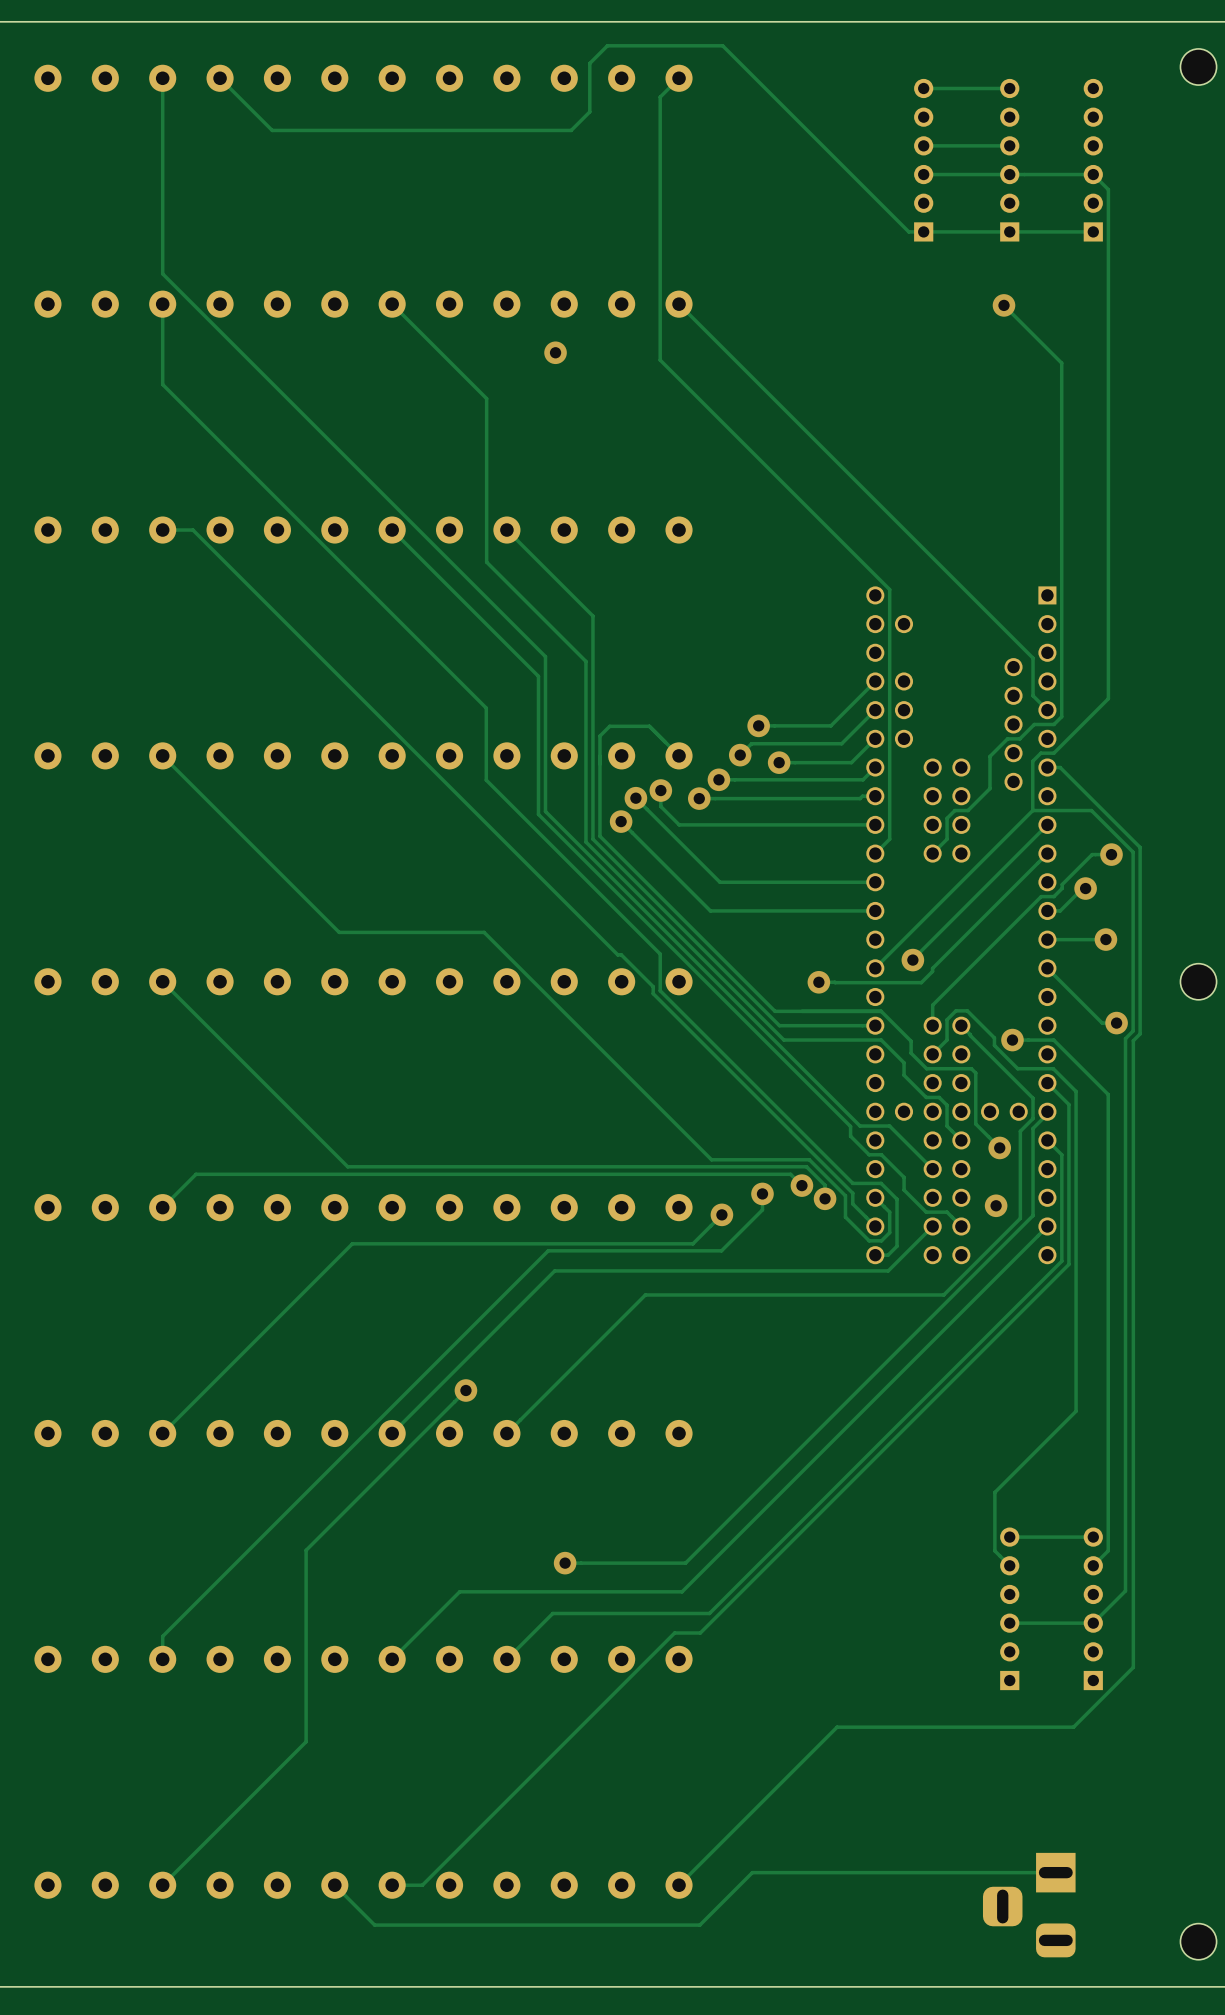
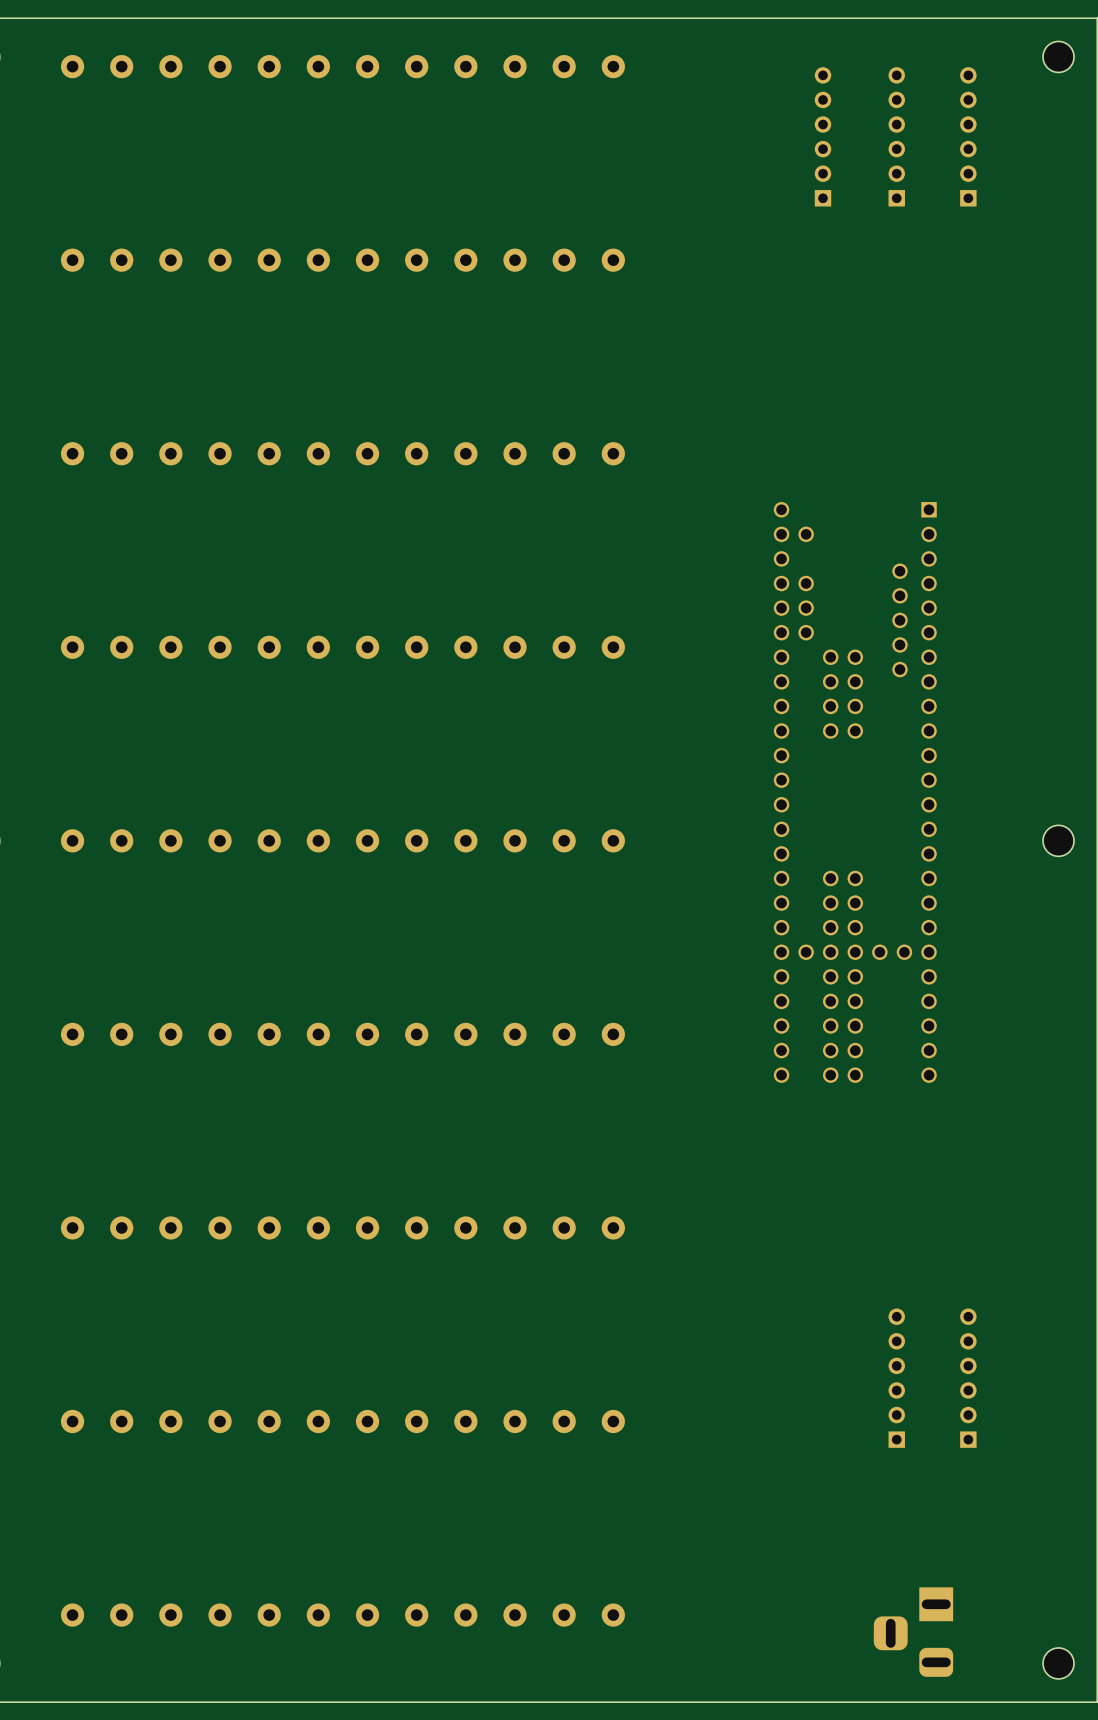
track: (162, 78) (162, 273) (545, 656) (545, 811) (860, 1126) (889, 1126) (932, 1169) -> none
track: (220, 78) (272, 130) (571, 130) (589, 111) (589, 63) (607, 45) (722, 45) (908, 231) (1093, 231) -> none
track: (679, 78) (660, 97) (660, 360) (889, 589) (889, 839) (875, 853) -> none
track: (1009, 88) (923, 88) -> none
track: (1009, 145) (923, 145) -> none
track: (923, 174) (1093, 174) (1108, 189) (1108, 698) (1053, 753) (1040, 753) (1032, 761) (1032, 810) -> none
track: (162, 304) (162, 384) (486, 708) (486, 780) (660, 954) (660, 990) (852, 1183) (881, 1183) (897, 1199) (897, 1246) (888, 1255) (875, 1255) -> none
track: (392, 304) (486, 398) (486, 562) (585, 661) (585, 842) (783, 1040) (881, 1040) (904, 1062) (904, 1075) (926, 1097) (939, 1097) (947, 1105) (947, 1126) (961, 1140) -> none
track: (679, 304) (1033, 658) (1033, 695) (1047, 710) -> none
track: (1004, 305) (1061, 363) (1061, 716) (1053, 724) (1034, 724) (1019, 738) (1007, 738) (989, 756) (989, 788) (968, 810) (954, 810) (947, 818) (947, 839) (932, 853) -> none
via: (1004, 305) -> none
via: (555, 352) -> none
track: (162, 530) (192, 530) (617, 954) (621, 954) (653, 986) (653, 993) (852, 1193) (852, 1203) (875, 1226) -> none
track: (392, 530) (538, 676) (538, 814) (850, 1126) (850, 1136) (869, 1154) (881, 1154) (904, 1177) (904, 1190) (926, 1212) (947, 1212) (961, 1226) -> none
track: (506, 530) (592, 616) (592, 839) (779, 1025) (875, 1025) -> none
track: (875, 681) (830, 725) (758, 725) -> none
track: (875, 710) (841, 743) (751, 743) (740, 755) -> none
via: (758, 725) -> none
track: (875, 738) (851, 762) (779, 762) -> none
track: (162, 755) (339, 932) (484, 932) (711, 1159) (809, 1159) (845, 1195) (845, 1217) (869, 1240) (881, 1240) (889, 1232) (889, 1212) (875, 1197) -> none
track: (679, 755) (649, 726) (609, 726) (599, 736) (599, 836) (775, 1011) (881, 1011) (911, 1041) (911, 1053) (926, 1068) (971, 1068) (975, 1073) (975, 1123) (999, 1147) -> none
via: (740, 755) -> none
via: (779, 762) -> none
track: (875, 767) (863, 779) (718, 779) -> none
track: (1047, 767) (1060, 767) (1140, 847) (1140, 1033) (1133, 1040) (1133, 1667) (1073, 1727) (837, 1727) (679, 1885) -> none
via: (718, 779) -> none
track: (660, 790) (660, 806) (679, 824) (875, 824) -> none
via: (660, 790) -> none
track: (875, 796) (862, 796) (860, 798) (699, 798) -> none
track: (635, 798) (719, 882) (875, 882) -> none
via: (635, 798) -> none
via: (699, 798) -> none
track: (1032, 810) (875, 968) -> none
track: (1032, 810) (1091, 810) (1133, 852) (1133, 1031) (1125, 1038) (1125, 1590) (1093, 1623) (1009, 1623) -> none
track: (621, 821) (710, 910) (875, 910) -> none
via: (621, 821) -> none
track: (1047, 824) (912, 960) -> none
track: (1047, 853) (932, 968) (932, 971) (921, 982) (818, 982) -> none
track: (1111, 854) (1092, 854) (1062, 884) (1062, 888) (1053, 896) (1041, 896) (932, 1005) (932, 1025) -> none
via: (1111, 854) -> none
track: (1085, 888) (1082, 888) (1060, 910) (1047, 910) -> none
via: (1085, 888) -> none
track: (1105, 939) (1047, 939) -> none
via: (1105, 939) -> none
via: (912, 960) -> none
track: (1047, 968) (1102, 1023) (1116, 1023) -> none
track: (162, 981) (347, 1166) (806, 1166) (825, 1185) (825, 1198) -> none
via: (818, 982) -> none
via: (1116, 1023) -> none
track: (961, 1025) (1033, 1098) (1033, 1118) (1020, 1131) (1020, 1218) (943, 1294) (645, 1294) (506, 1433) -> none
track: (1012, 1040) (1053, 1040) (1108, 1094) (1108, 1550) (1093, 1565) -> none
via: (1012, 1040) -> none
track: (932, 1054) (947, 1040) (947, 1019) (955, 1010) (967, 1010) (994, 1037) (994, 1045) (1017, 1068) (1053, 1068) (1076, 1091) (1076, 1411) (994, 1492) (994, 1550) (1009, 1565) -> none
track: (1047, 1083) (1068, 1104) (1068, 1264) (700, 1633) (674, 1633) (422, 1885) (392, 1885) -> none
track: (1047, 1111) (1047, 1114) (1033, 1128) (1033, 1215) (685, 1563) (565, 1563) -> none
track: (1047, 1140) (1061, 1154) (1061, 1261) (709, 1613) (552, 1613) (506, 1659) -> none
via: (999, 1147) -> none
track: (801, 1185) (790, 1174) (196, 1174) (162, 1207) -> none
via: (801, 1185) -> none
track: (762, 1193) (762, 1209) (721, 1250) (548, 1250) (162, 1636) (162, 1659) -> none
via: (762, 1193) -> none
via: (825, 1198) -> none
via: (996, 1205) -> none
track: (721, 1214) (692, 1243) (352, 1243) (162, 1433) -> none
via: (721, 1214) -> none
track: (932, 1226) (888, 1270) (554, 1270) (392, 1433) -> none
track: (1047, 1226) (682, 1591) (459, 1591) (392, 1659) -> none
track: (465, 1390) (306, 1550) (306, 1741) (162, 1885) -> none
via: (465, 1390) -> none
track: (1093, 1537) (1009, 1537) -> none
via: (565, 1563) -> none
track: (1055, 1872) (752, 1872) (699, 1925) (374, 1925) (334, 1885) -> none

